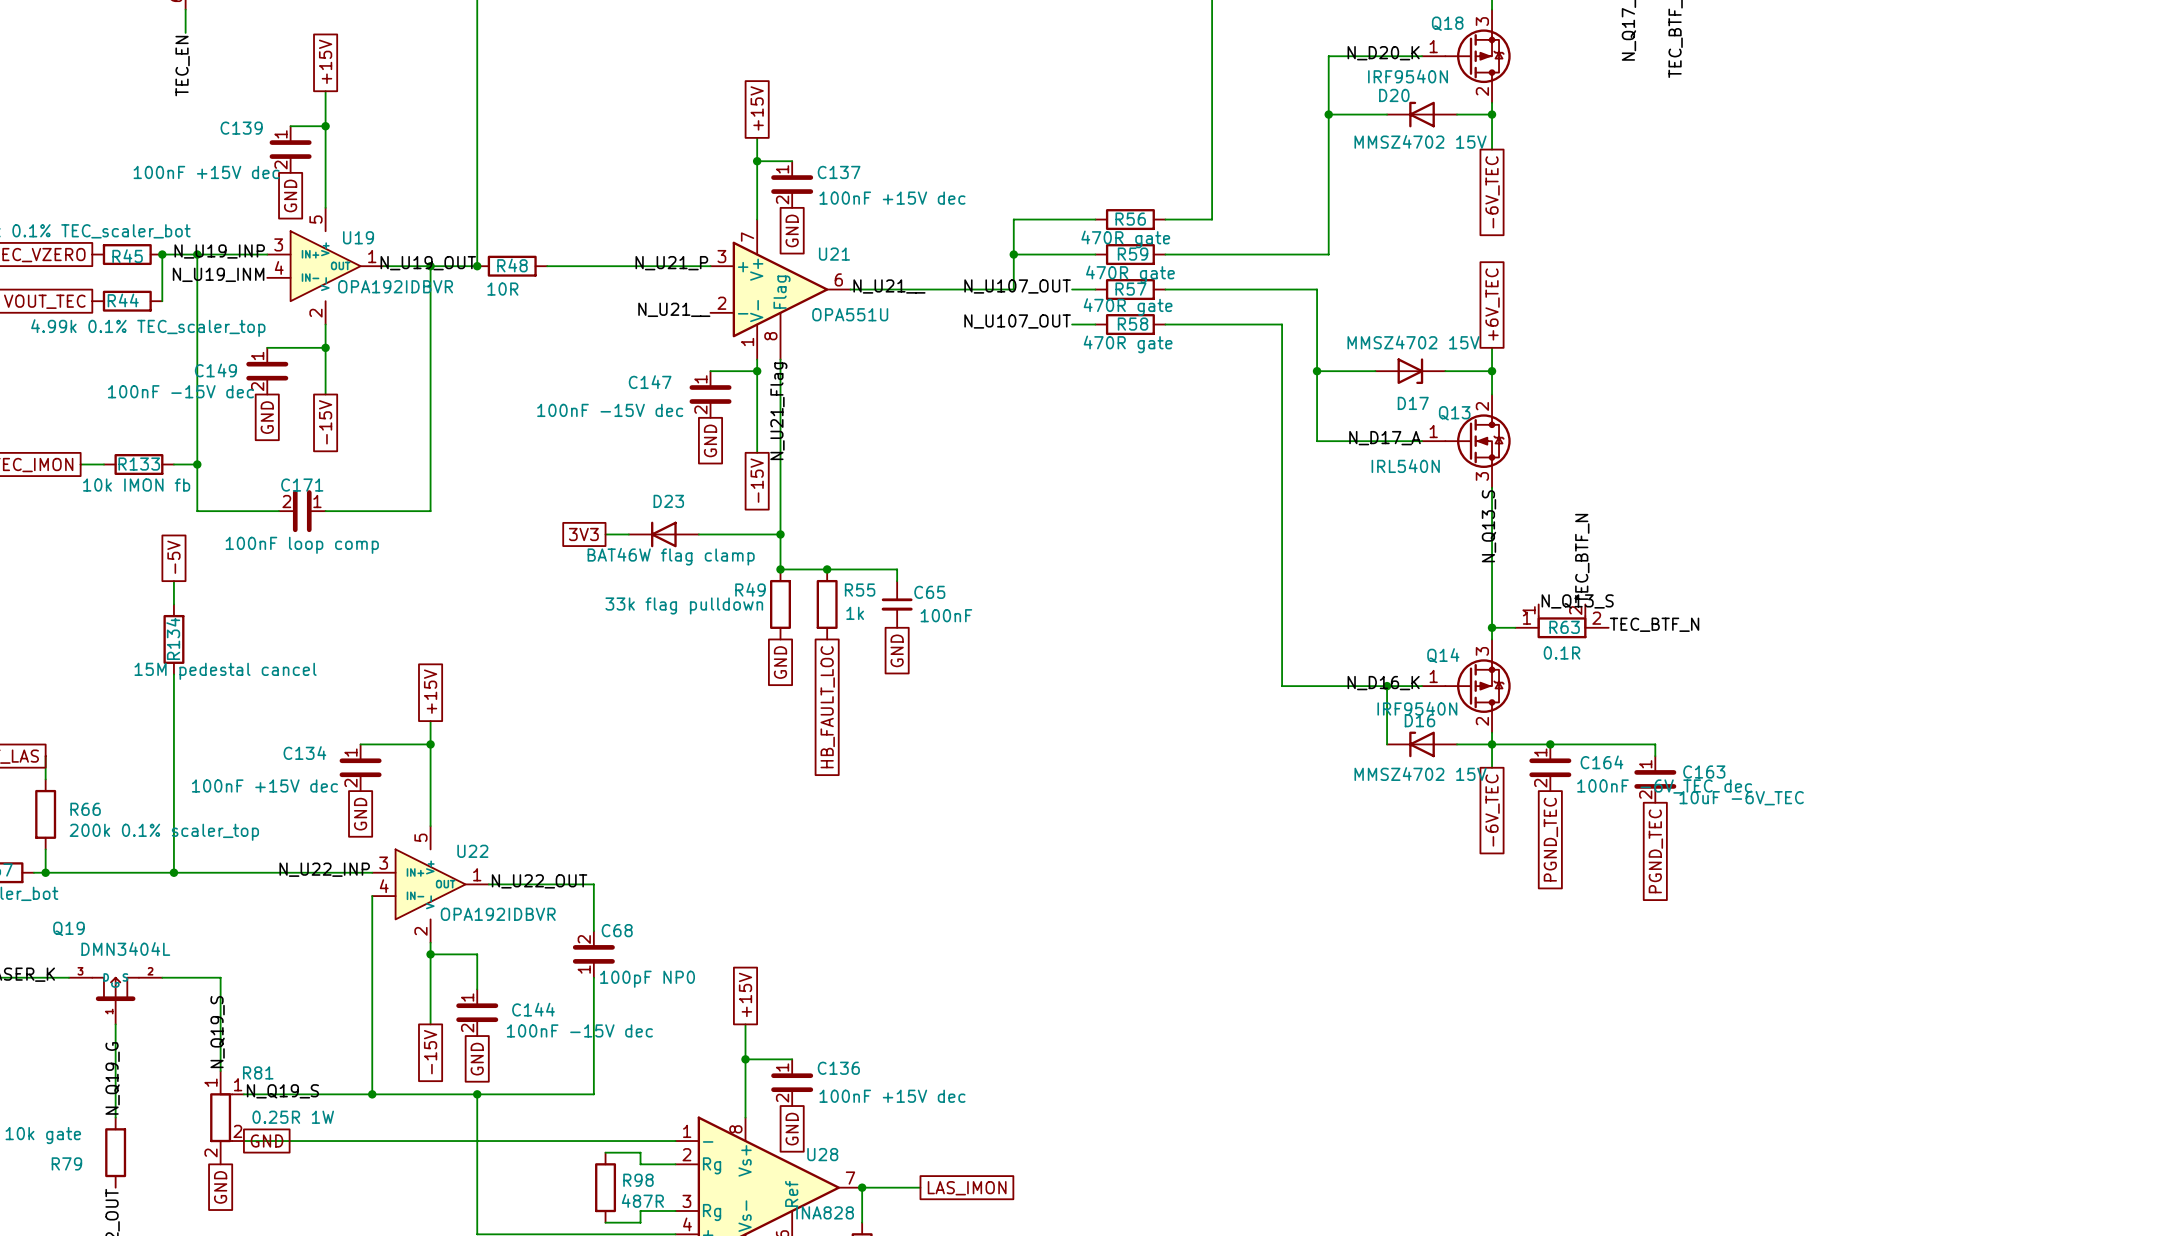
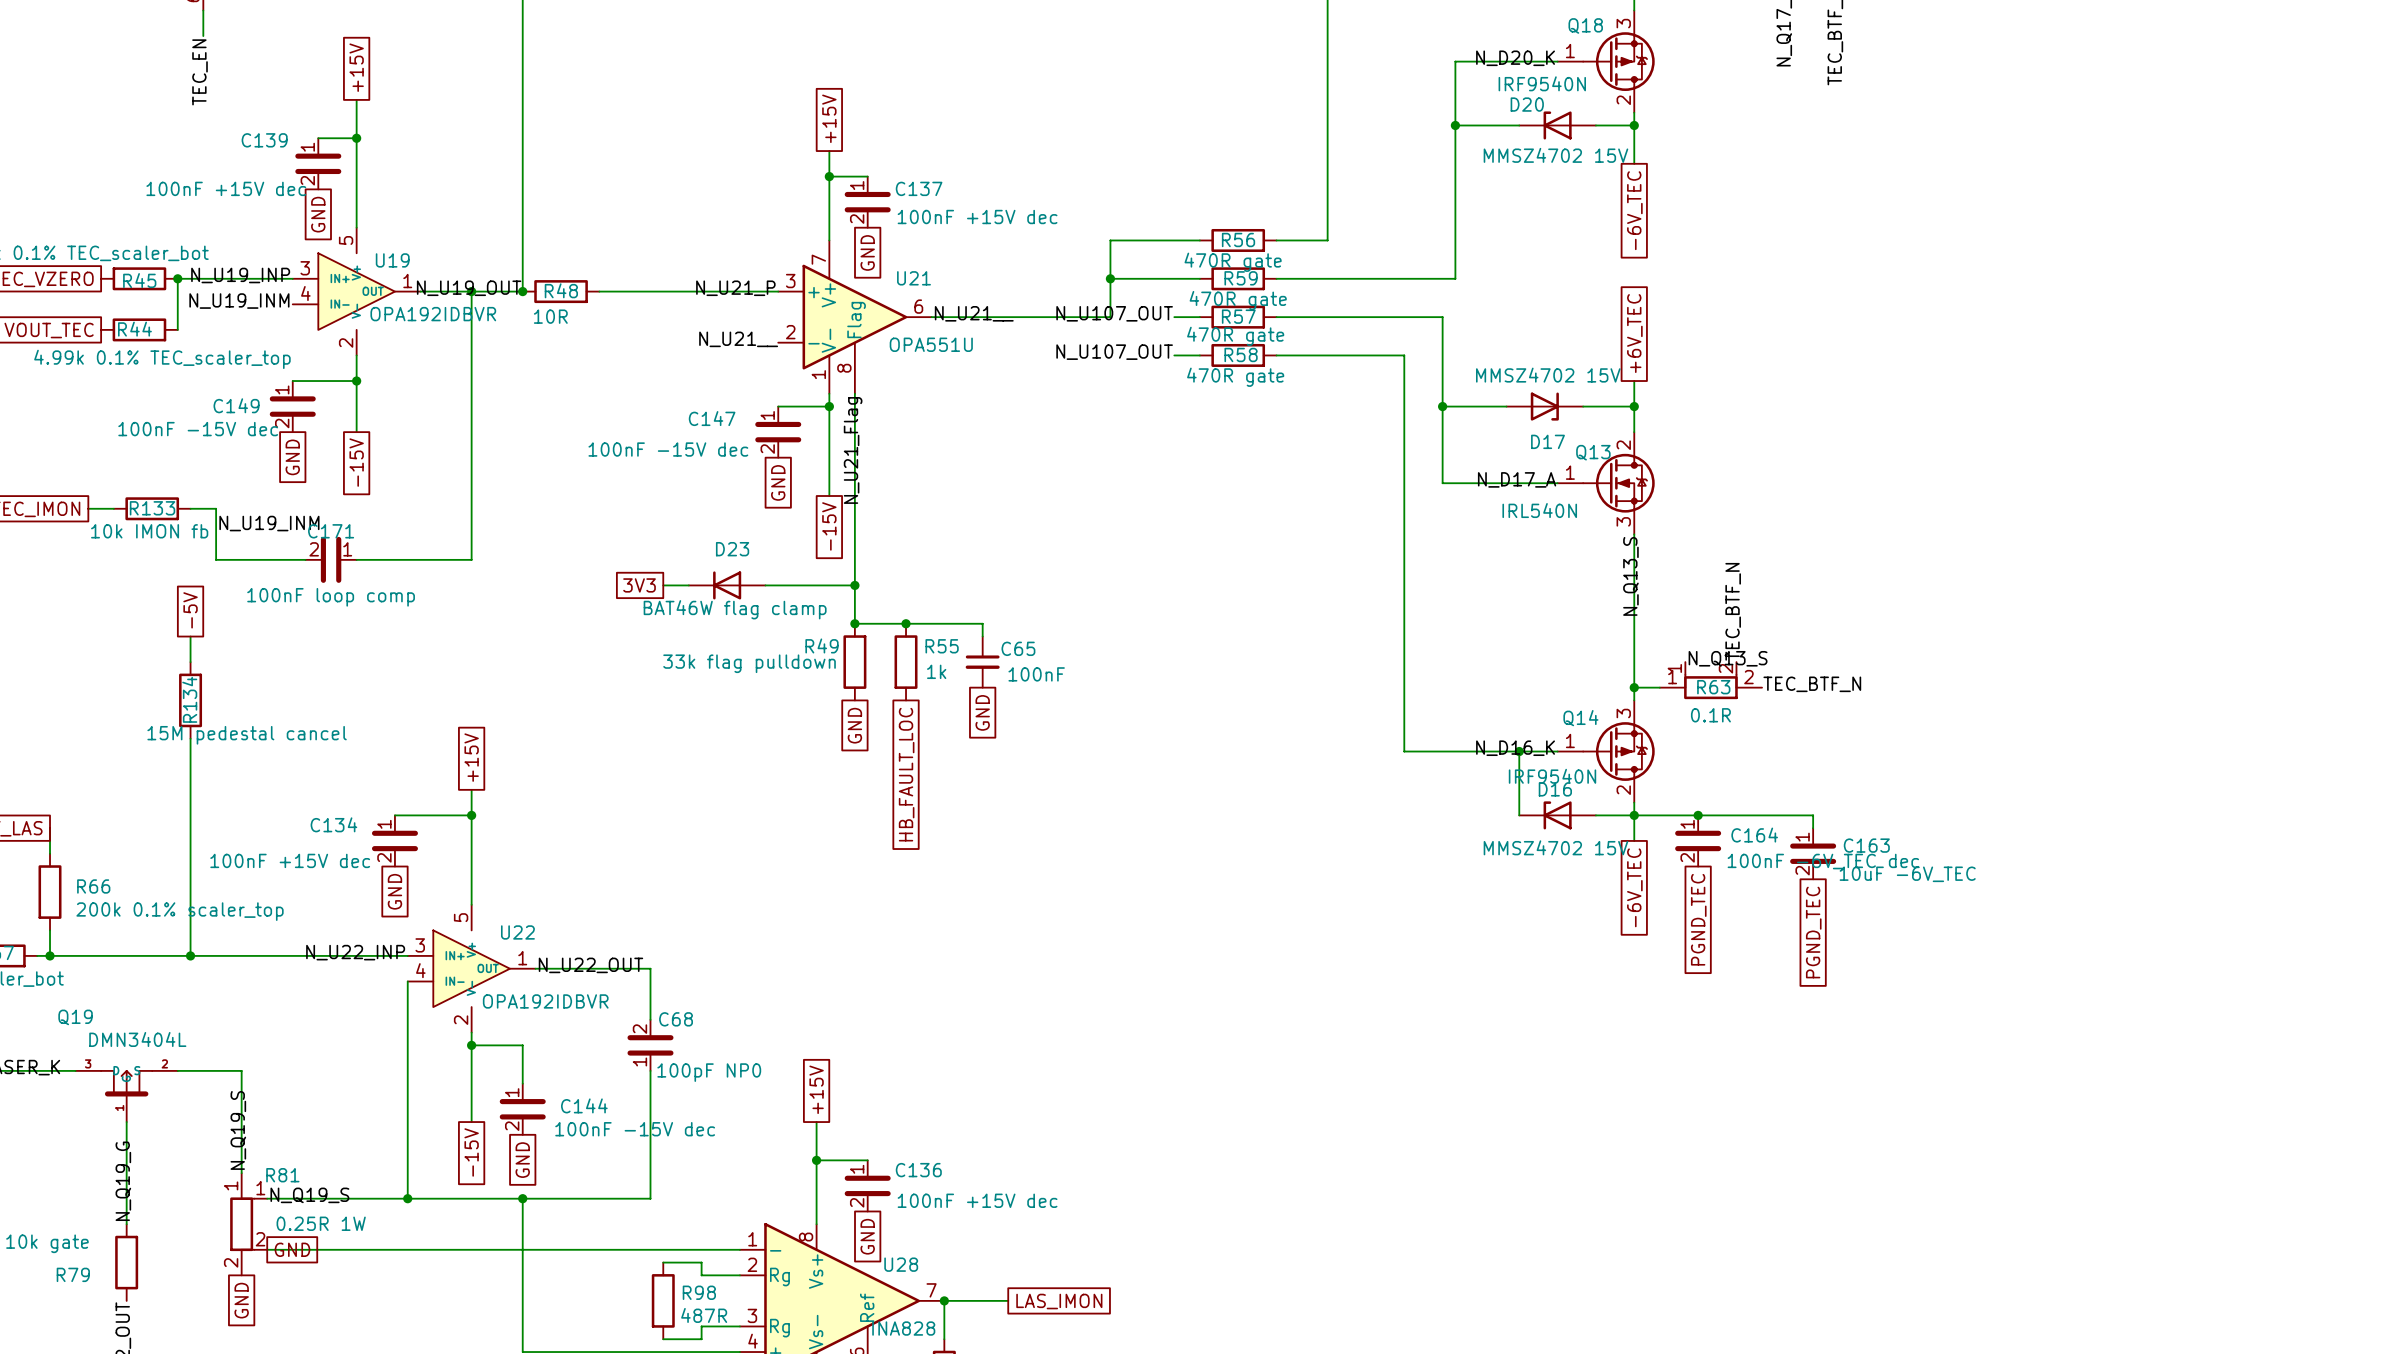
wire: (197, 254) (197, 464) -> none
junction: (197, 254) -> none
junction: (197, 464) -> none
label: none -> N_U19_INM (269, 523)

